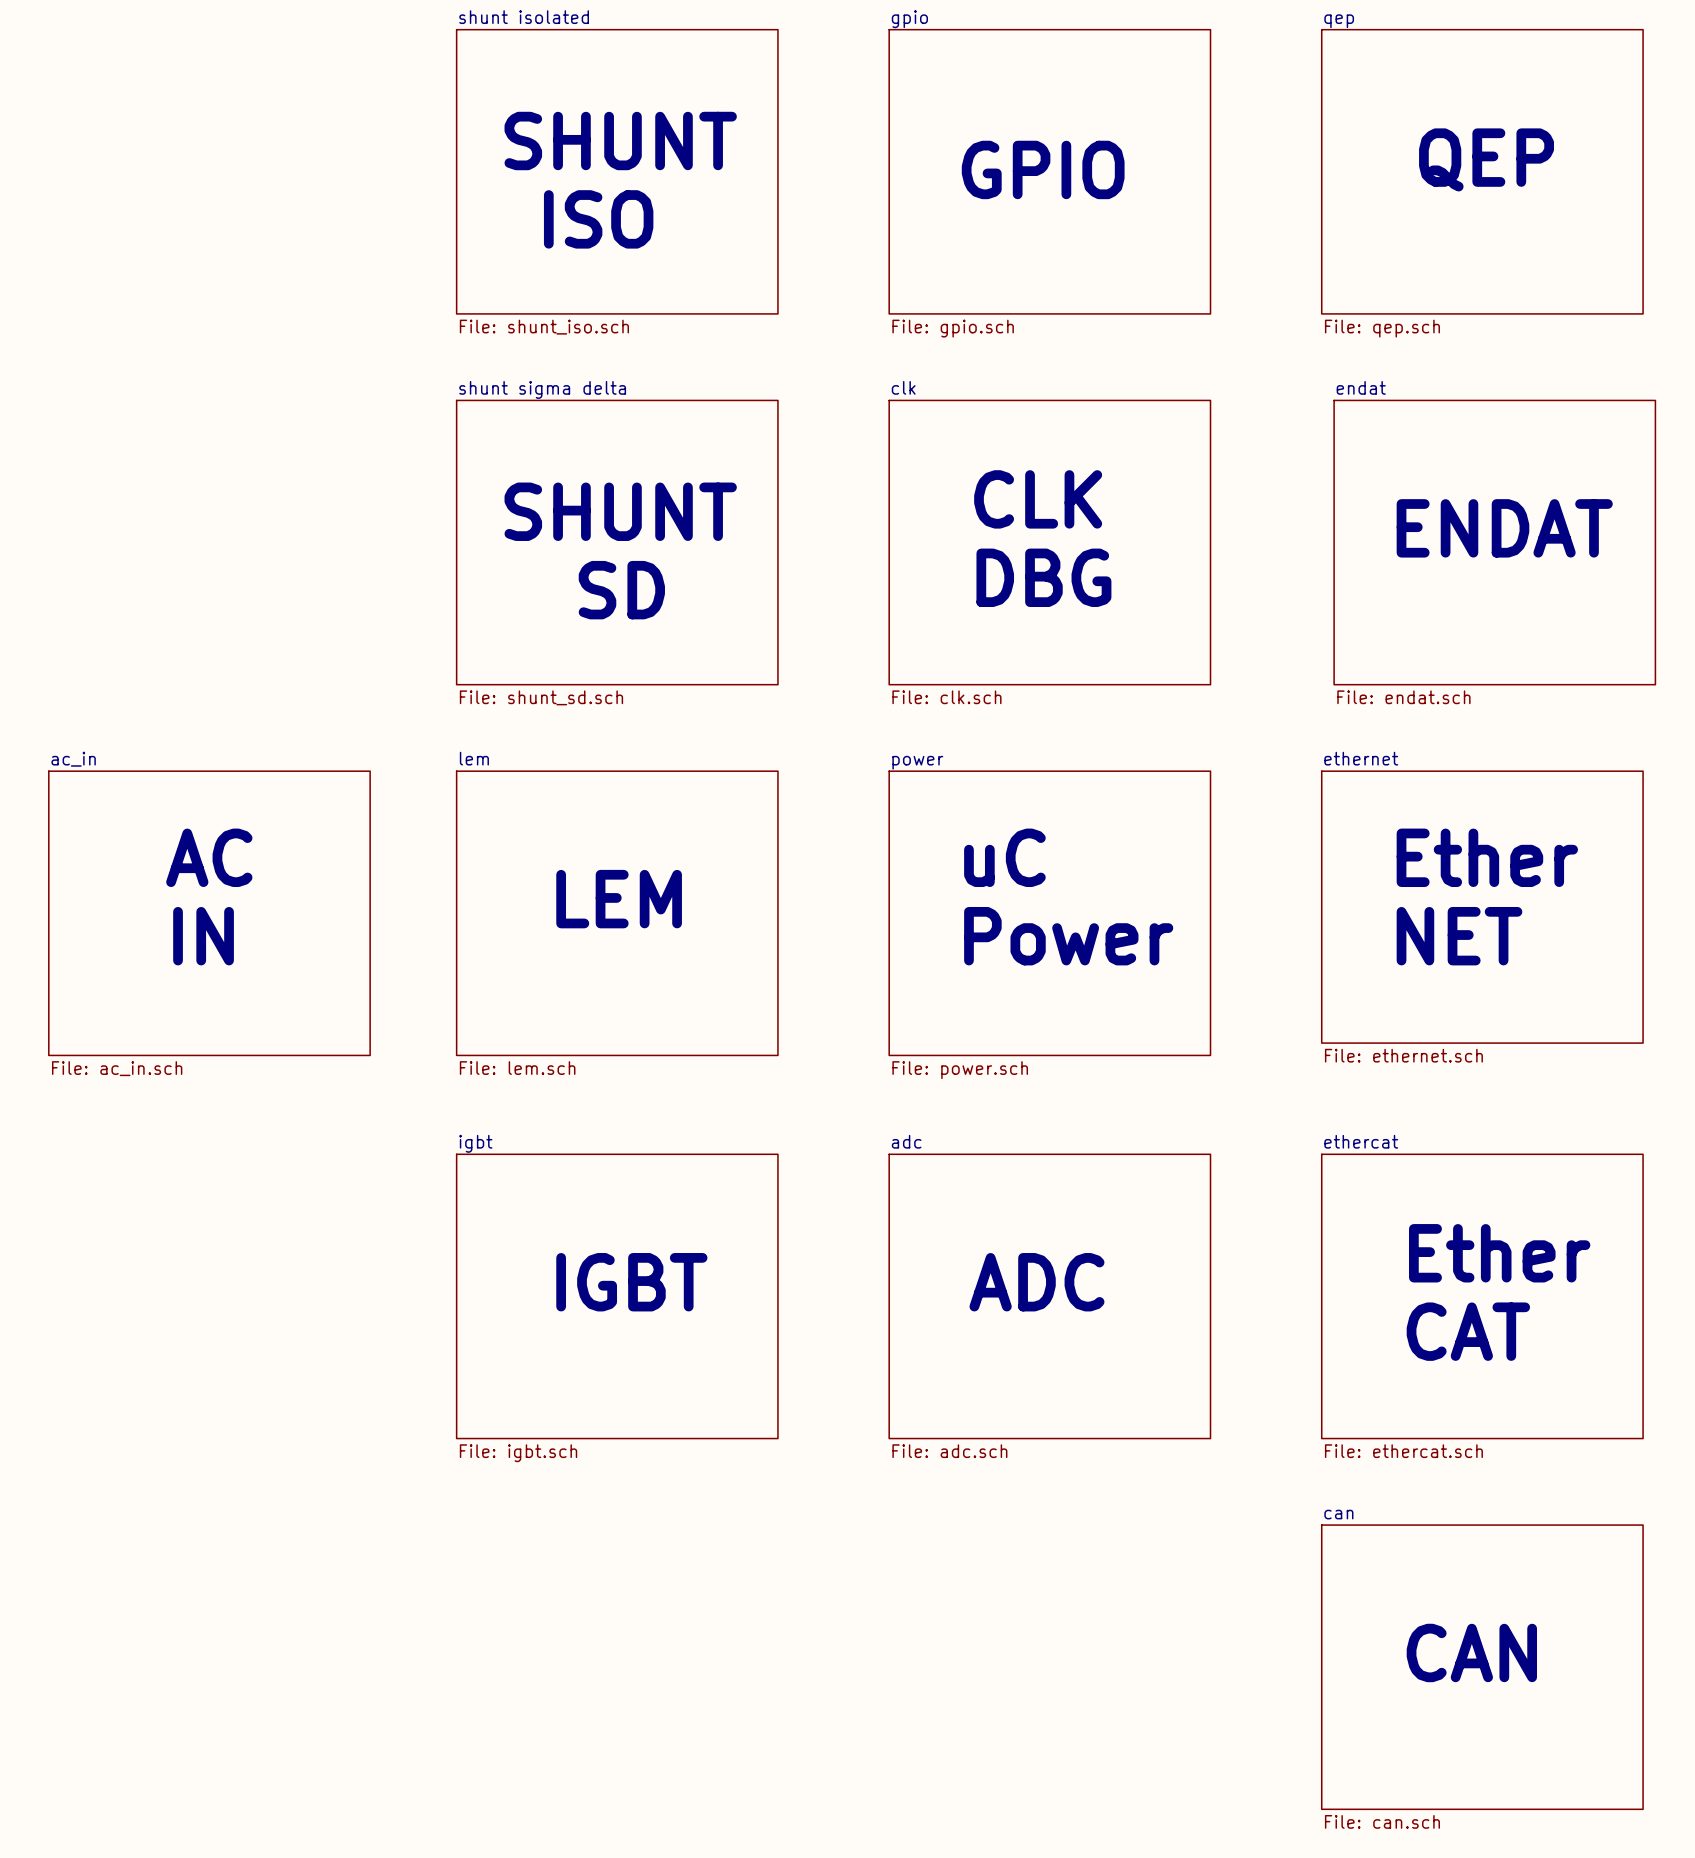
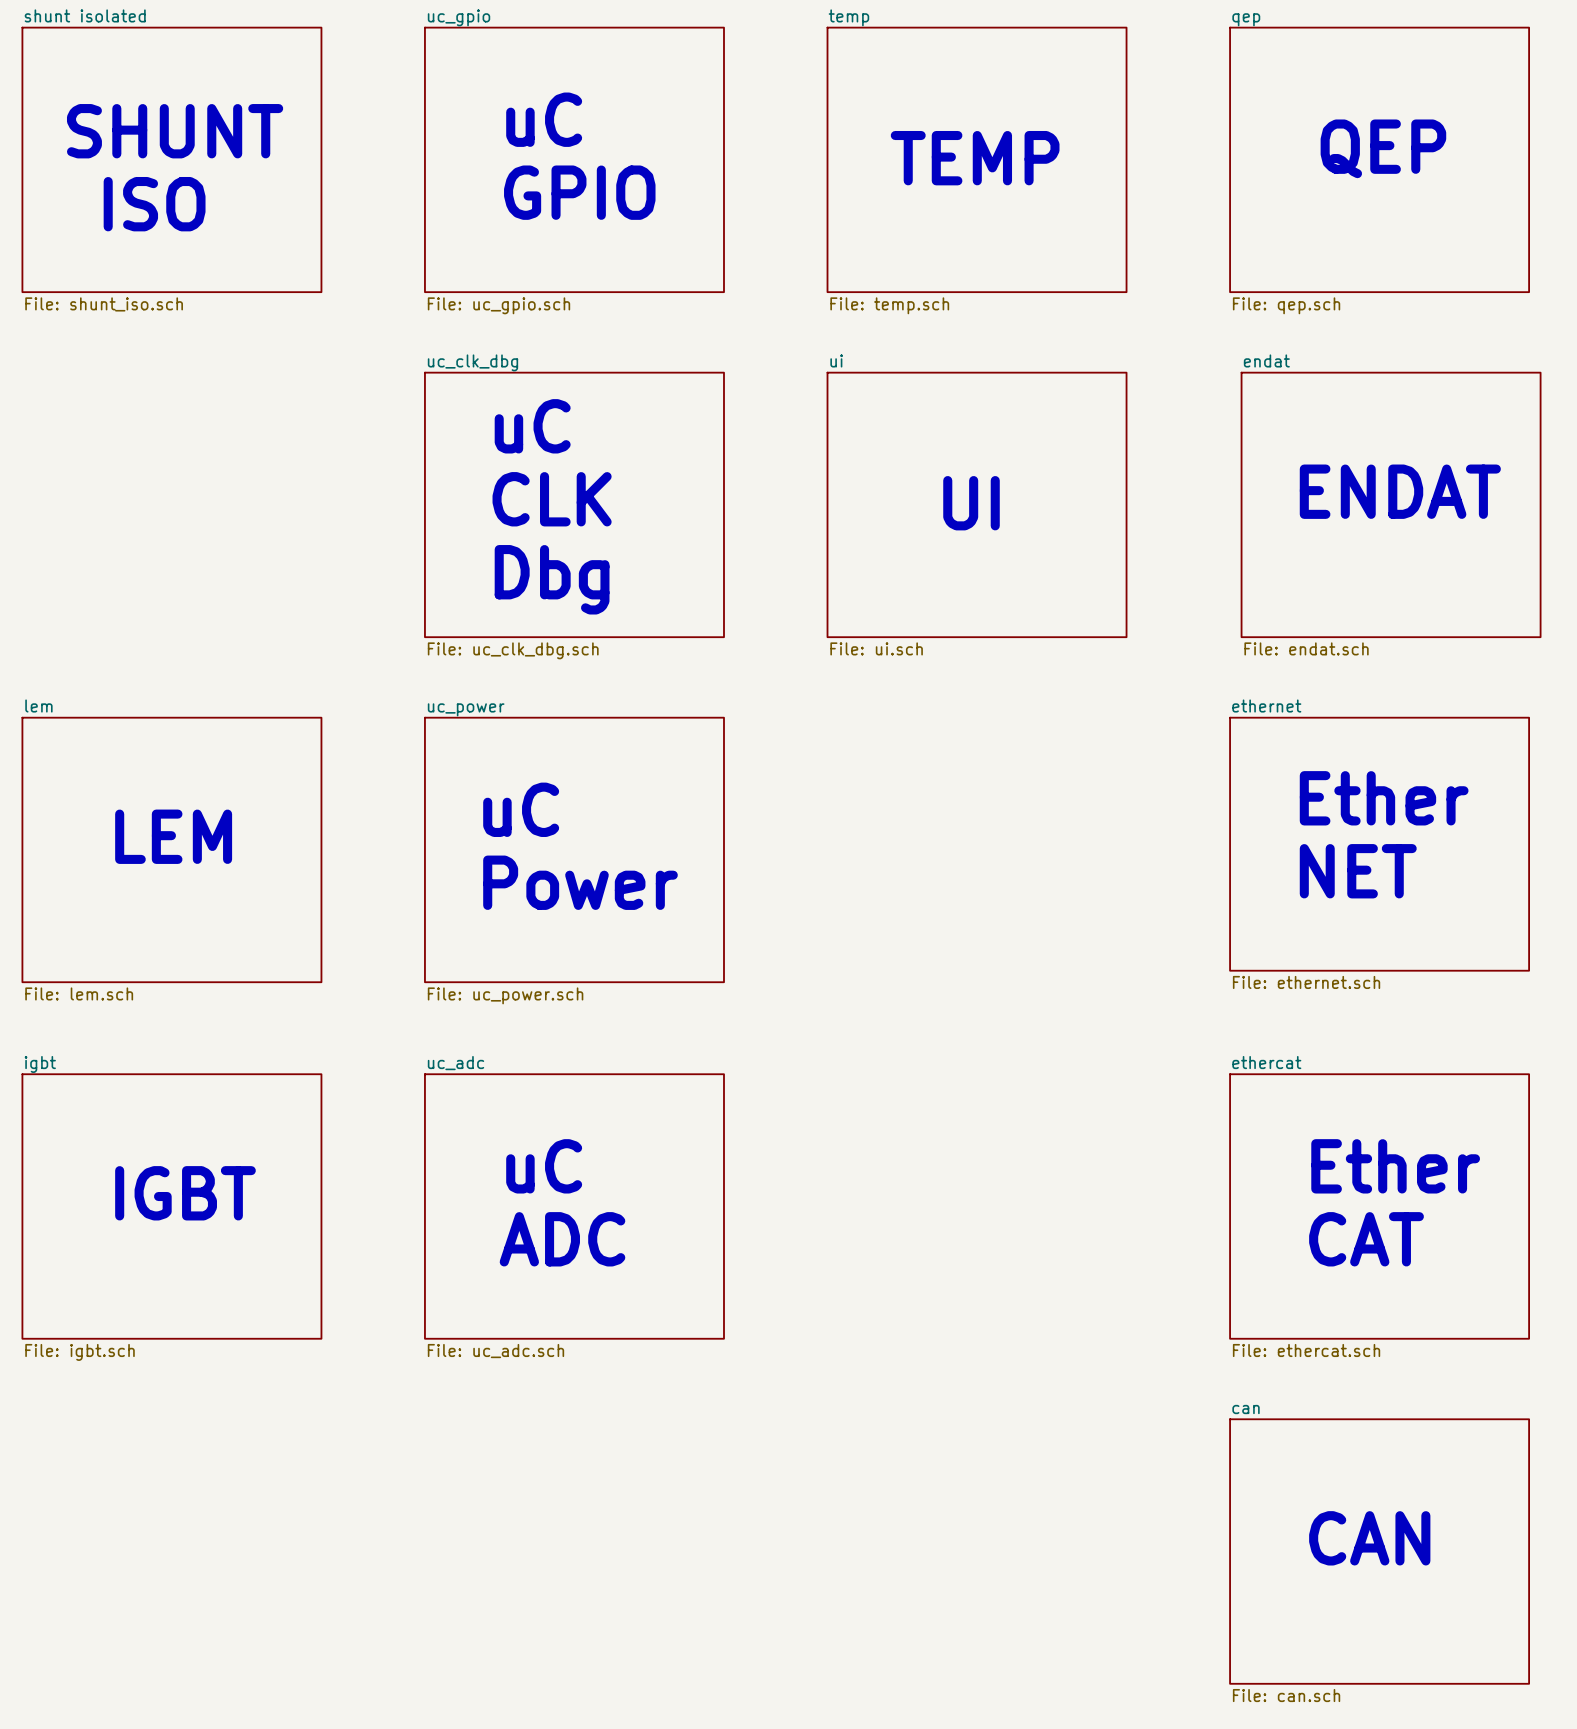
sheet shunt isolated name: shunt isolated (524, 17) -> uc_gpio (459, 17)
sheet gpio name: gpio (909, 19) -> temp (848, 17)
text: none -> uC (544, 119)
text: none -> SHUNT (175, 131)
text: SHUNT (620, 140) -> none
text: GPIO (1043, 169) -> TEMP (975, 158)
sheet shunt isolated: none -> File: shunt_iso.sch (171, 159)
text: none -> GPIO (579, 192)
text: none -> ISO (154, 204)
text: ISO (598, 219) -> none
sheet shunt isolated value: File: shunt_iso.sch (544, 327) -> File: uc_gpio.sch (498, 305)
sheet gpio value: File: gpio.sch (953, 328) -> File: temp.sch (889, 305)
sheet clk name: clk (903, 387) -> ui (836, 360)
sheet shunt sigma delta name: shunt sigma delta (542, 389) -> uc_clk_dbg (472, 362)
text: none -> uC (532, 426)
text: CLK (1038, 499) -> none
text: SHUNT (620, 511) -> none
text: none -> CLK (552, 499)
text: none -> UI (971, 503)
text: DBG (1043, 577) -> none
text: SD (621, 590) -> none
text: none -> Dbg (552, 579)
sheet shunt sigma delta value: File: shunt_sd.sch (541, 697) -> File: uc_clk_dbg.sch (513, 650)
sheet clk value: File: clk.sch (946, 697) -> File: ui.sch (876, 648)
sheet lem name: lem (474, 758) -> uc_power (466, 709)
text: AC (209, 857) -> none
text: uC (1004, 857) -> none
text: none -> uC (521, 809)
text: none -> LEM (173, 836)
text: LEM (619, 899) -> none
sheet lem: none -> File: lem.sch (171, 849)
sheet ac_in: File: ac_in.sch (209, 913) -> none
sheet power: File: power.sch (1049, 913) -> none
text: IN (203, 936) -> none
text: Power (1068, 936) -> none
text: none -> Power (580, 882)
sheet lem value: File: lem.sch (517, 1068) -> File: uc_power.sch (505, 995)
sheet igbt name: igbt (475, 1143) -> uc_adc (455, 1063)
text: none -> uC (544, 1166)
text: none -> IGBT (185, 1193)
text: IGBT (631, 1282) -> none
text: ADC (1036, 1282) -> none
sheet igbt: none -> File: igbt.sch (171, 1206)
sheet adc: File: adc.sch (1049, 1296) -> none
text: none -> ADC (562, 1239)
sheet igbt value: File: igbt.sch (518, 1453) -> File: uc_adc.sch (495, 1351)

